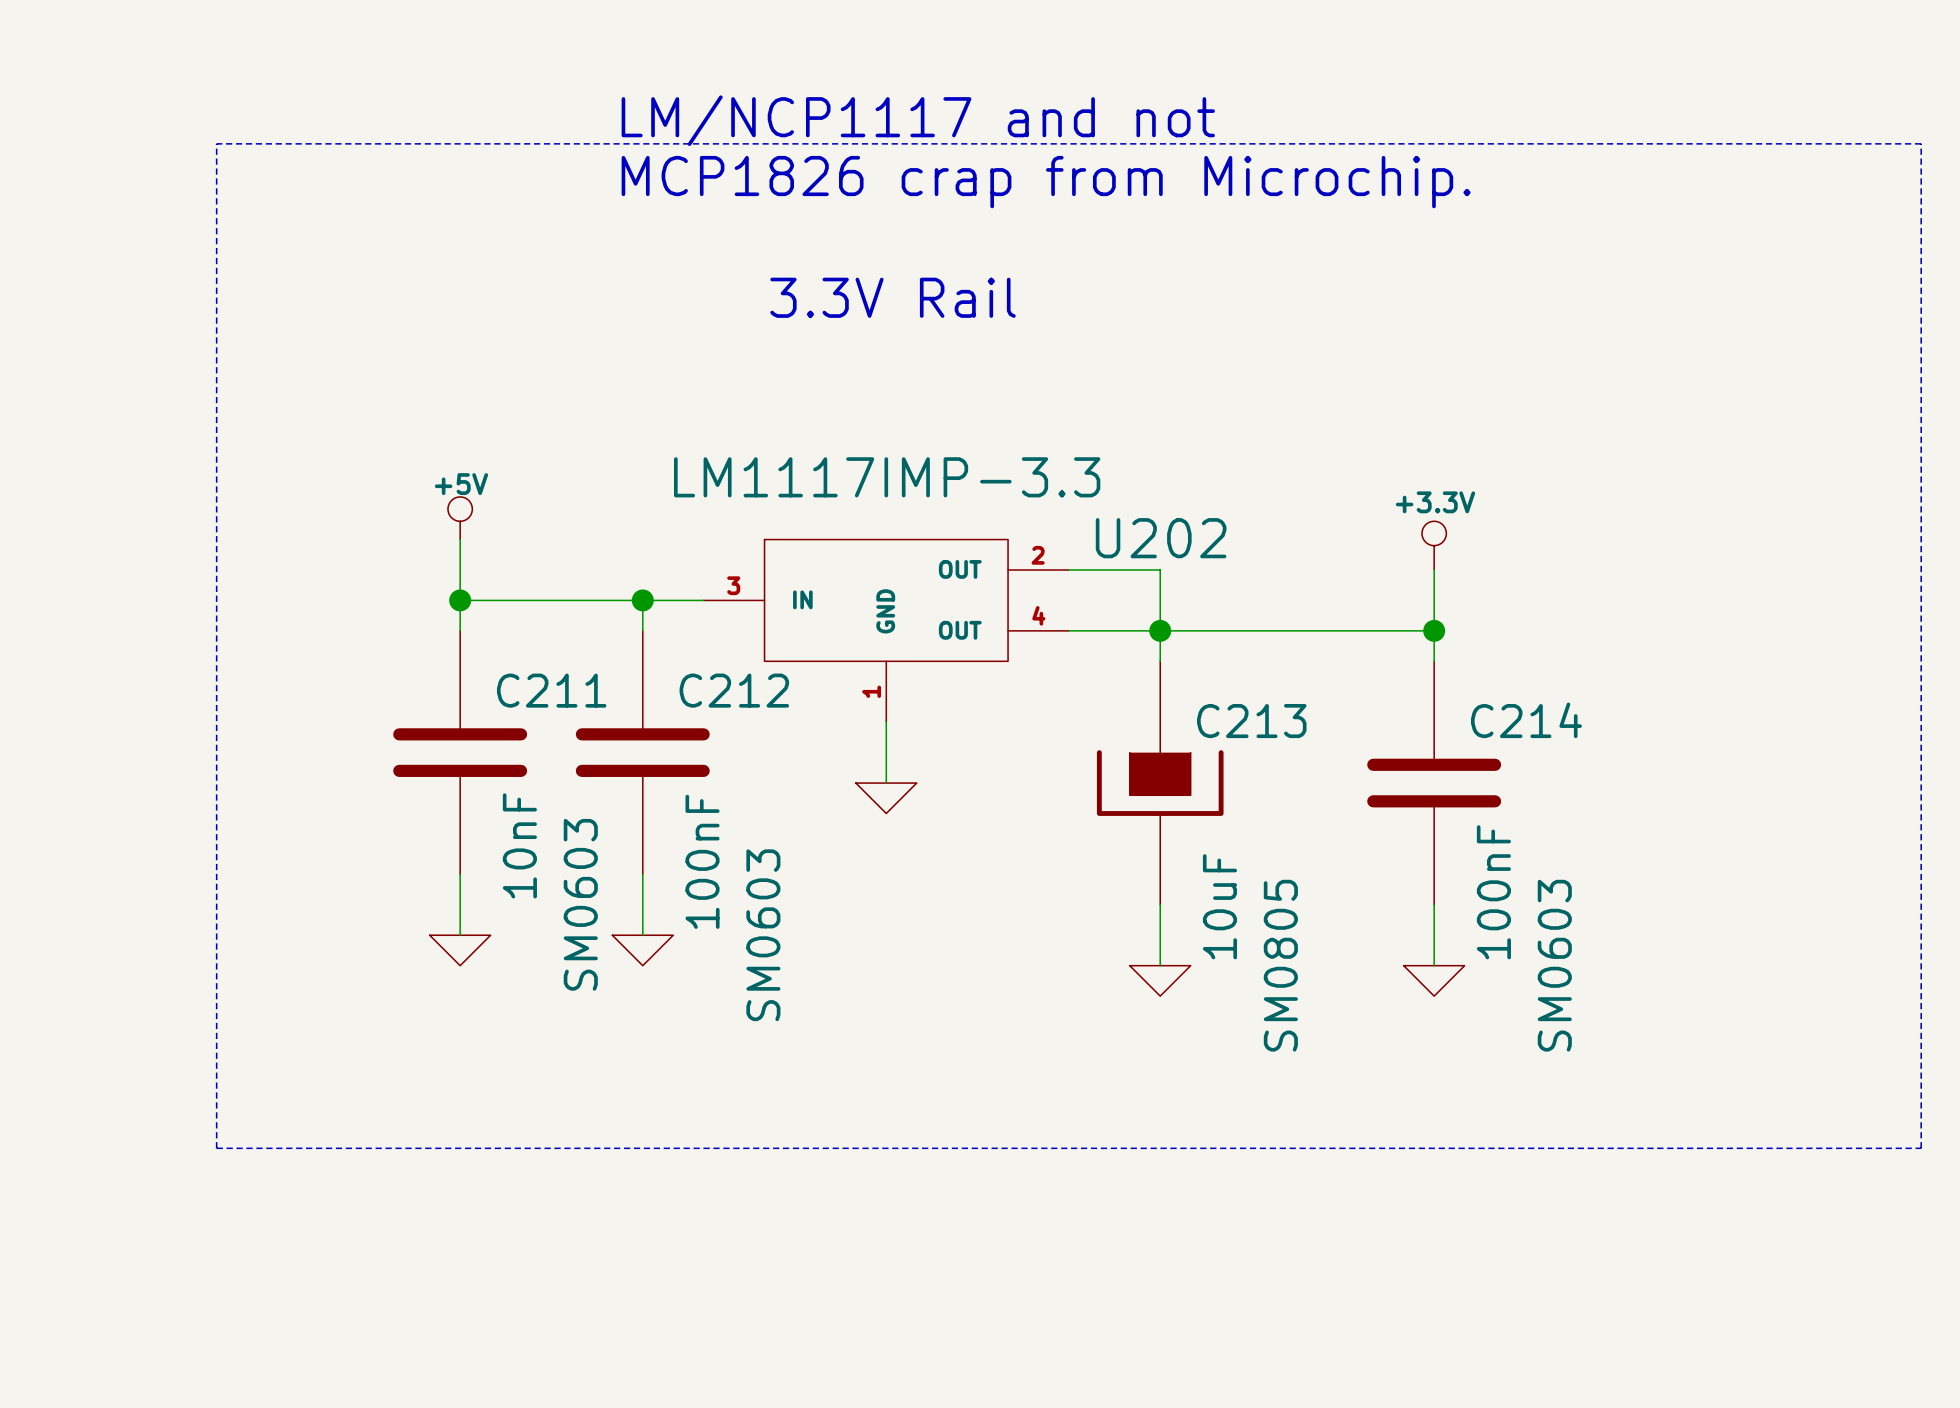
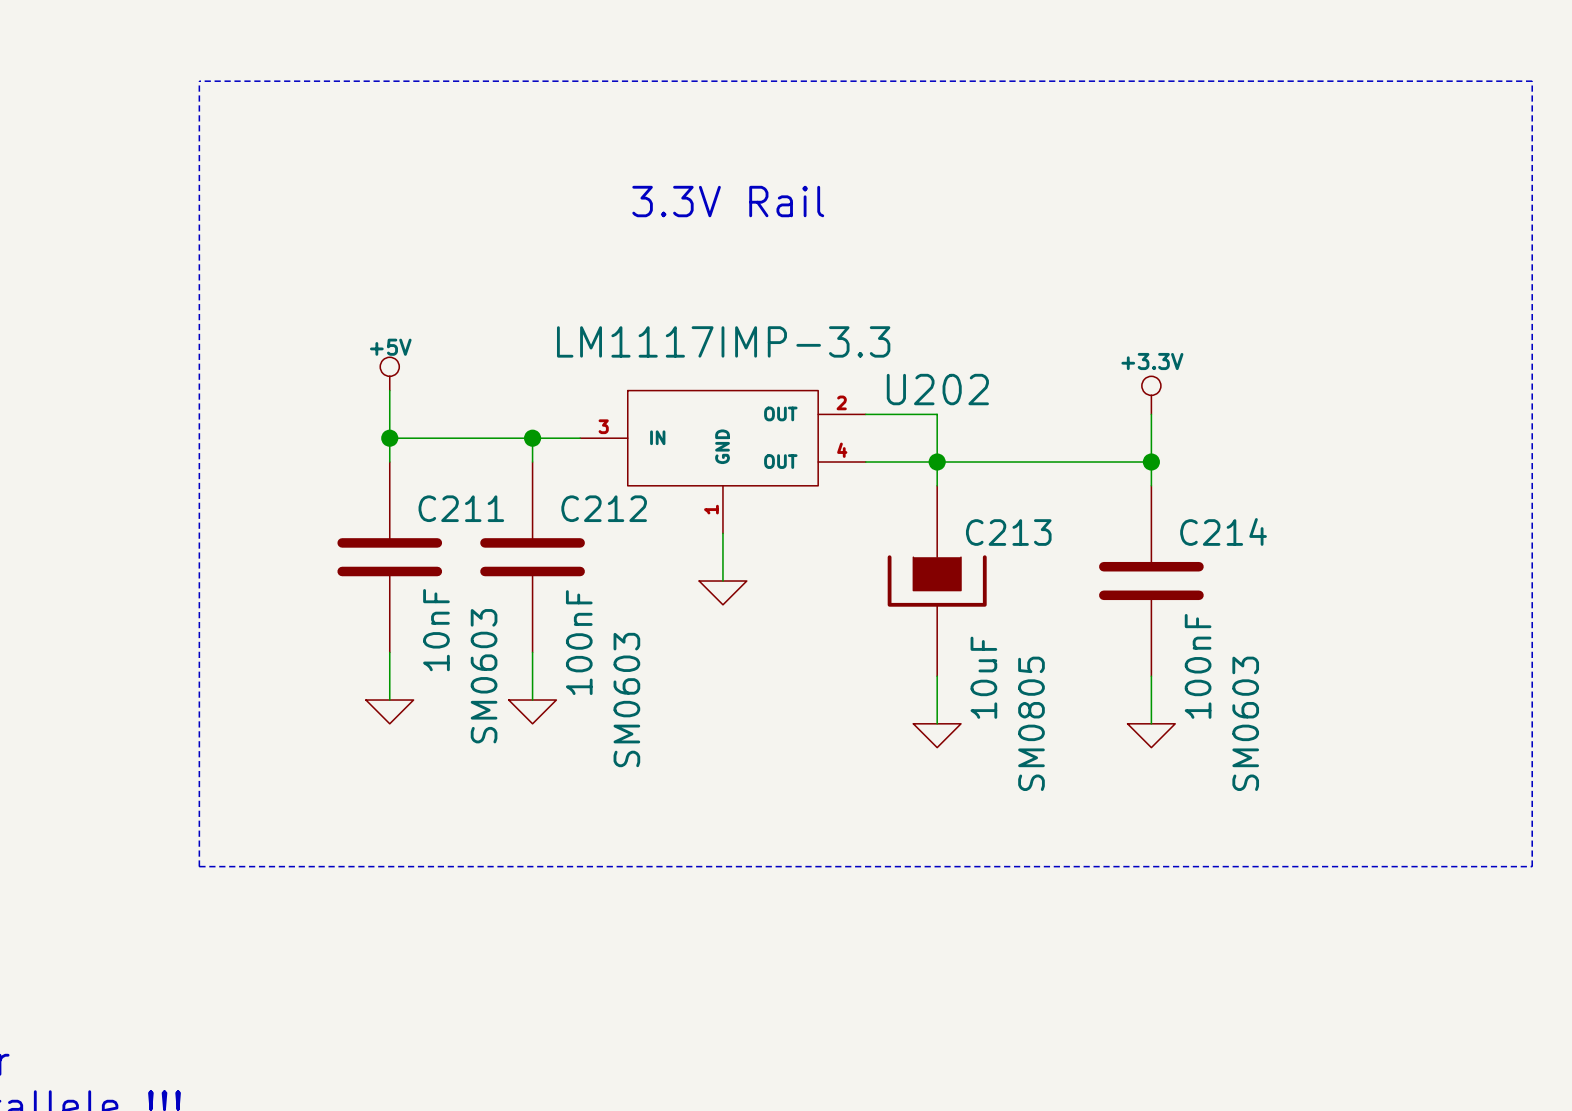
text: LM/NCP1117 and not (918, 120) -> none
text: MCP1826 crap from Microchip. (1046, 182) -> none

